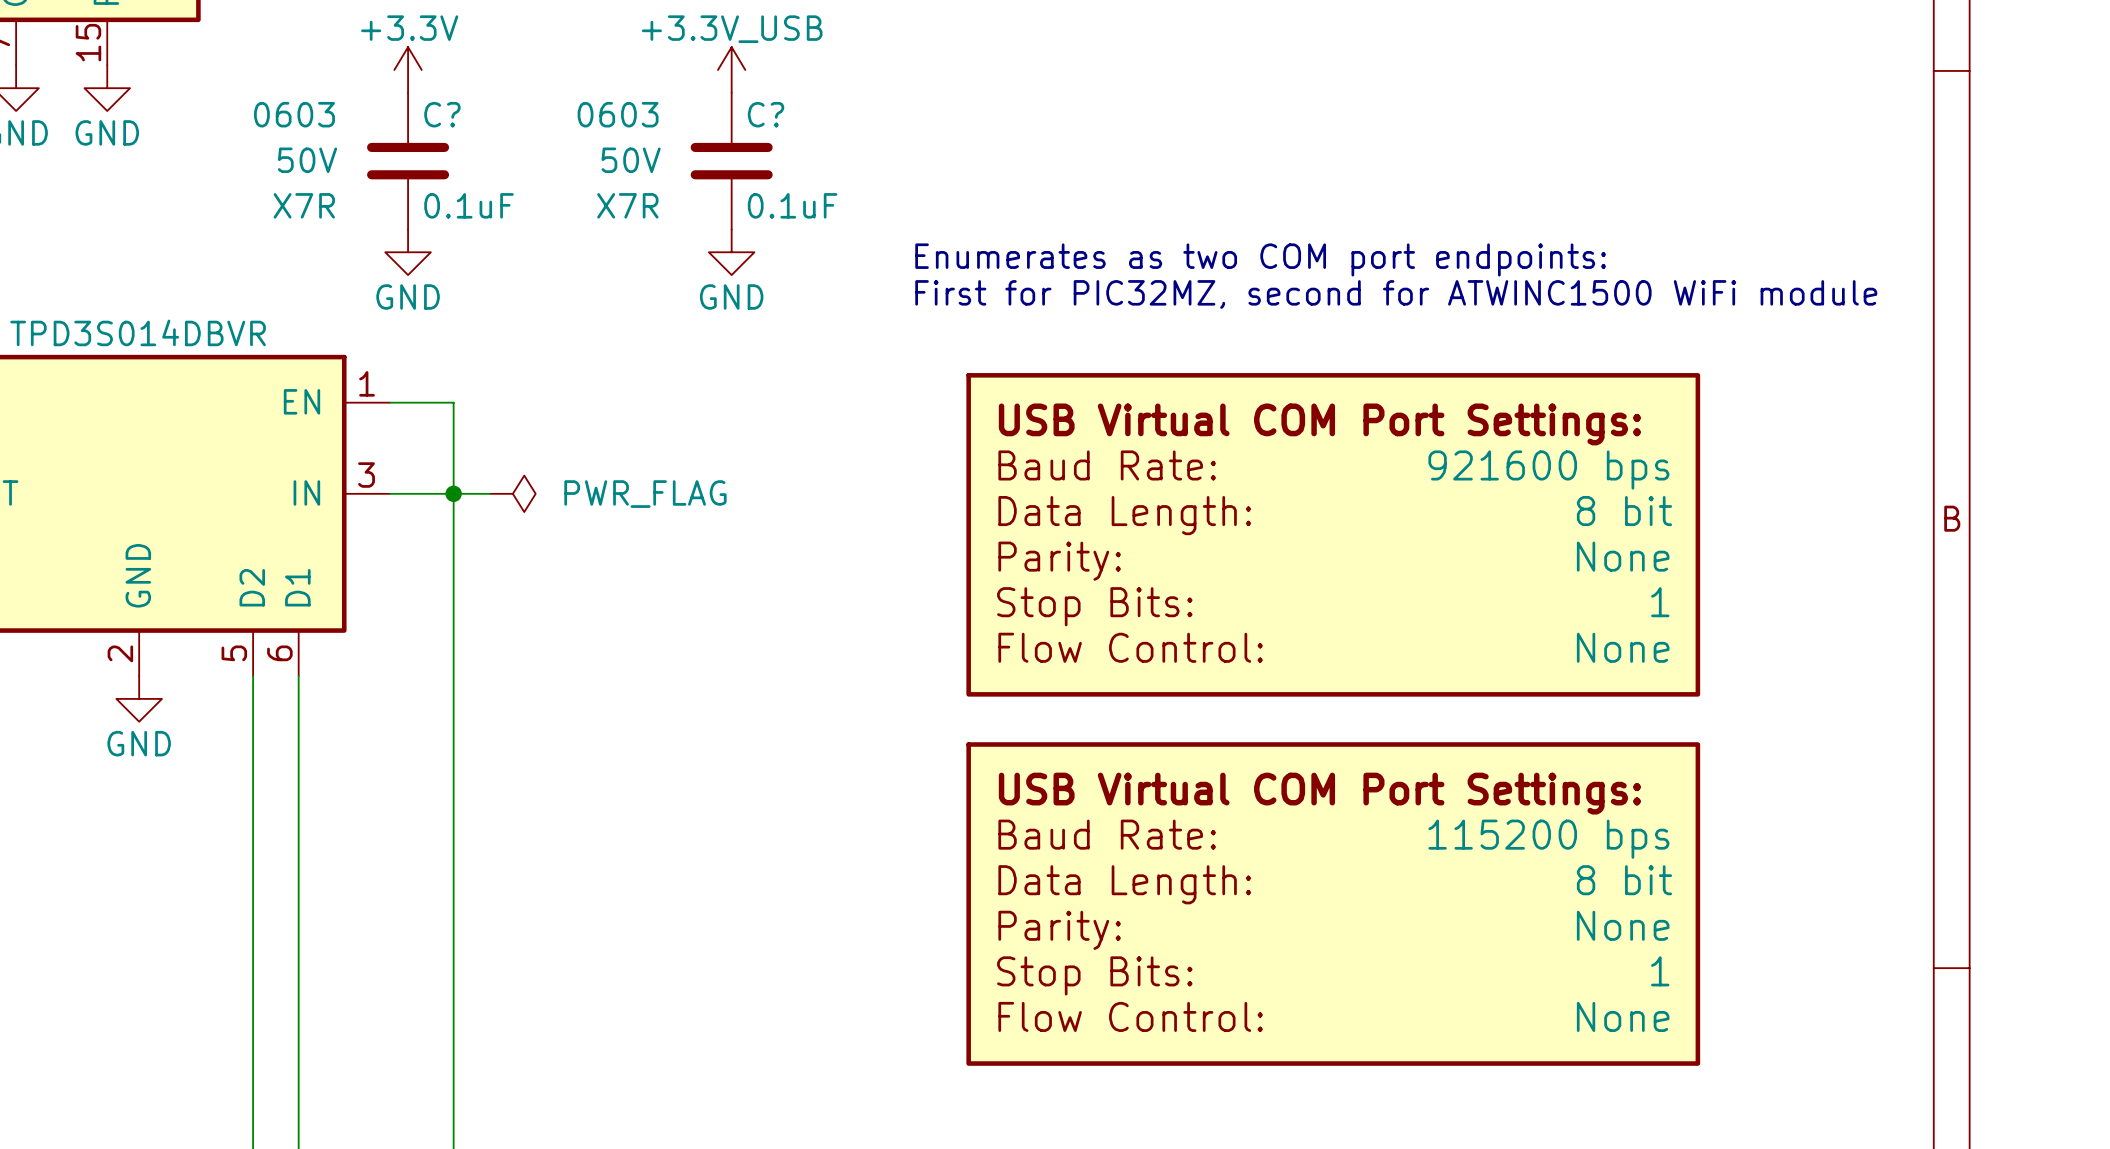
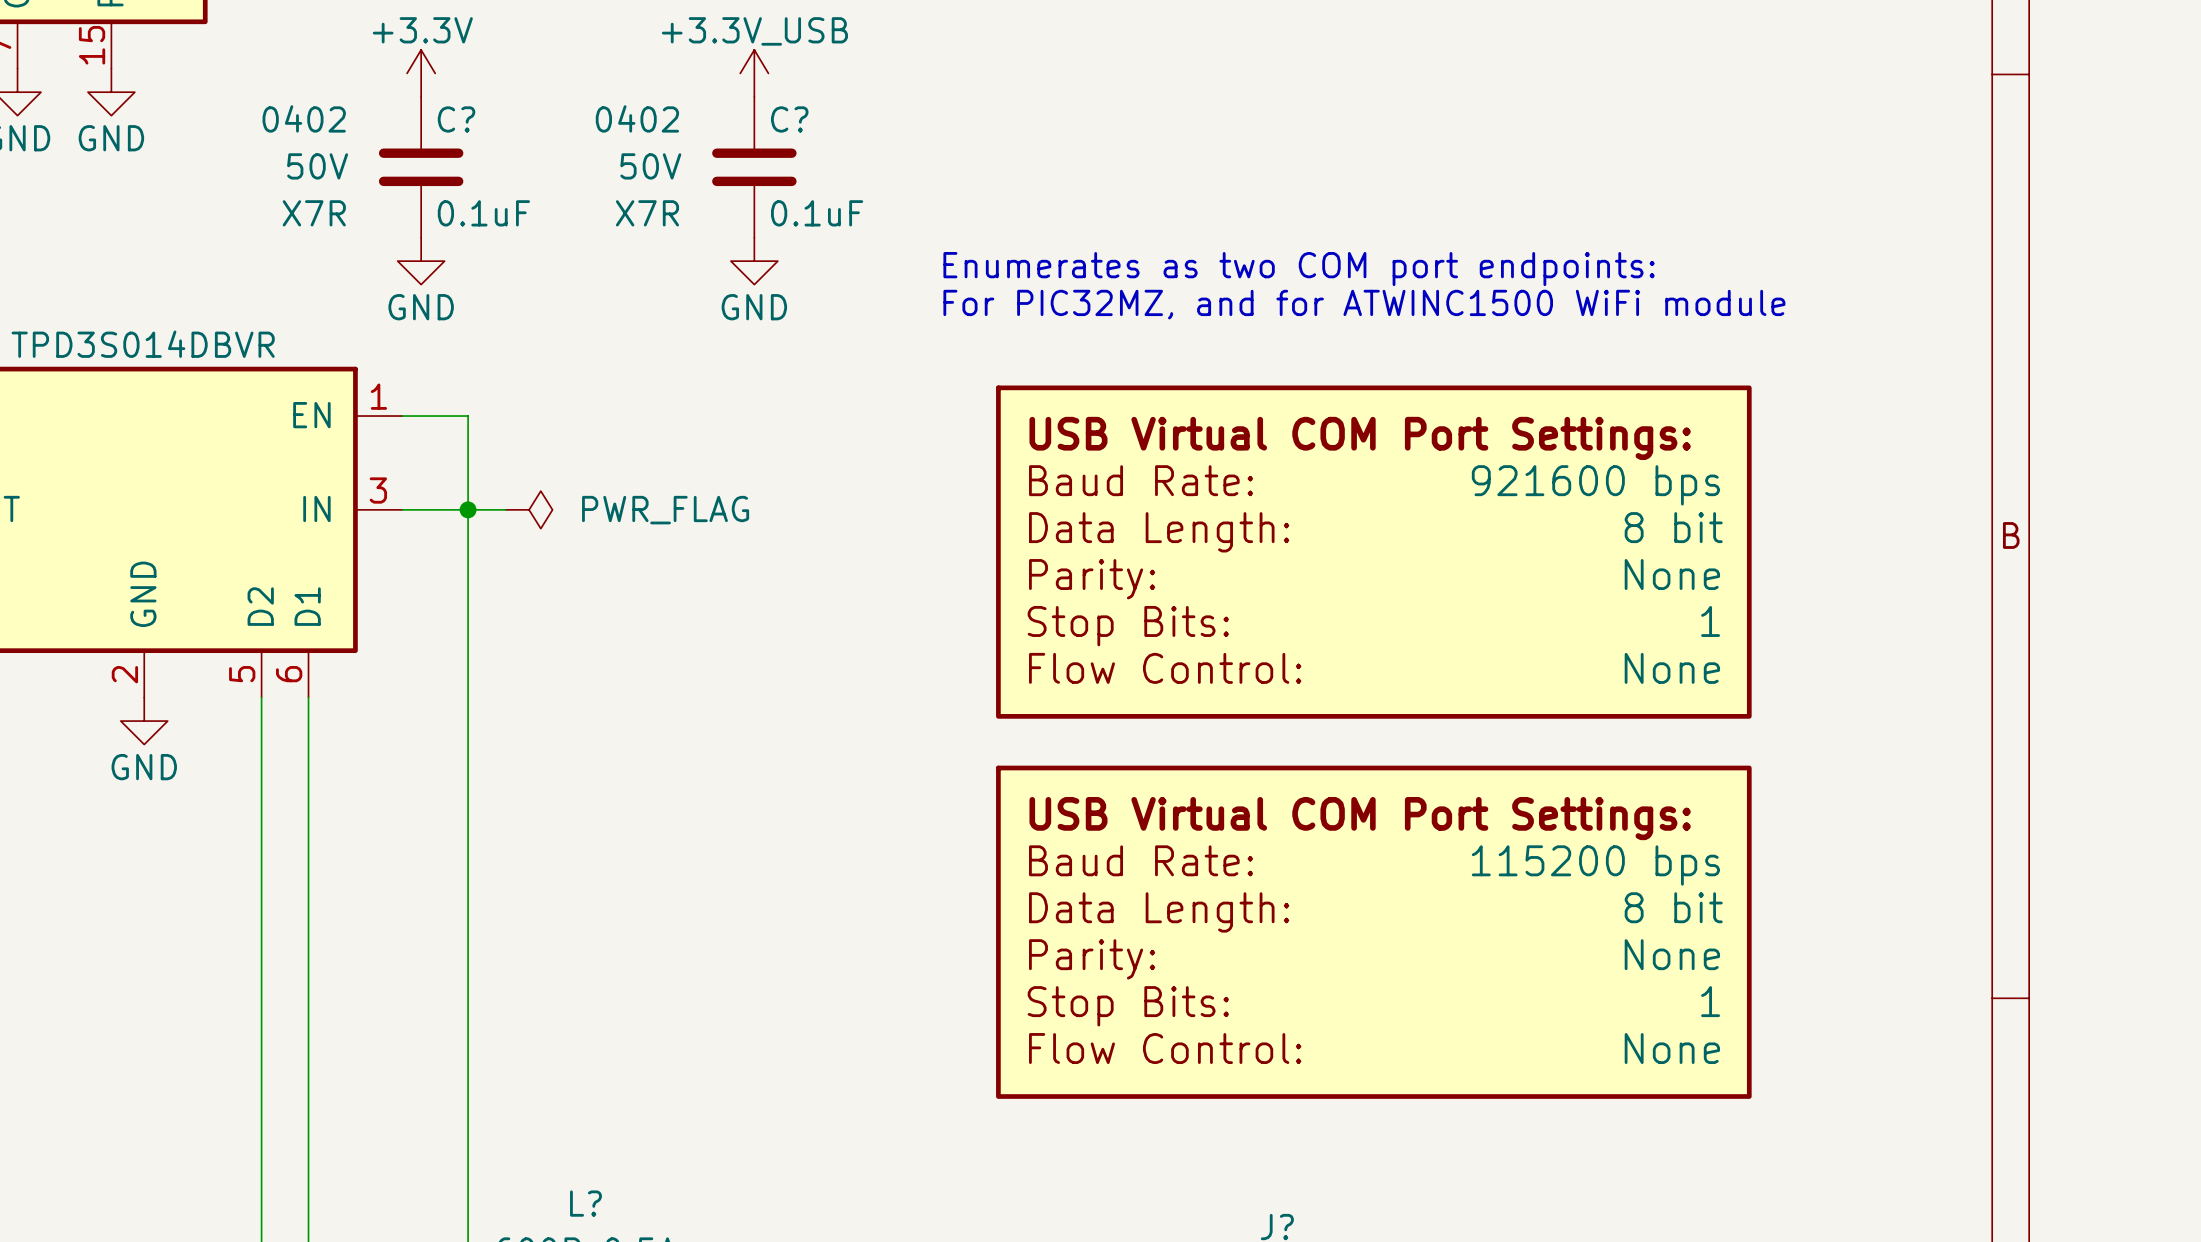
C? text: 0603 (294, 114) -> 0402 (304, 118)
C? text: 0603 (618, 114) -> 0402 (637, 118)
text: First for PIC32MZ, second for ATWINC1500 WiFi module (1396, 294) -> For PIC32MZ, and for ATWINC1500 WiFi module (1364, 304)

